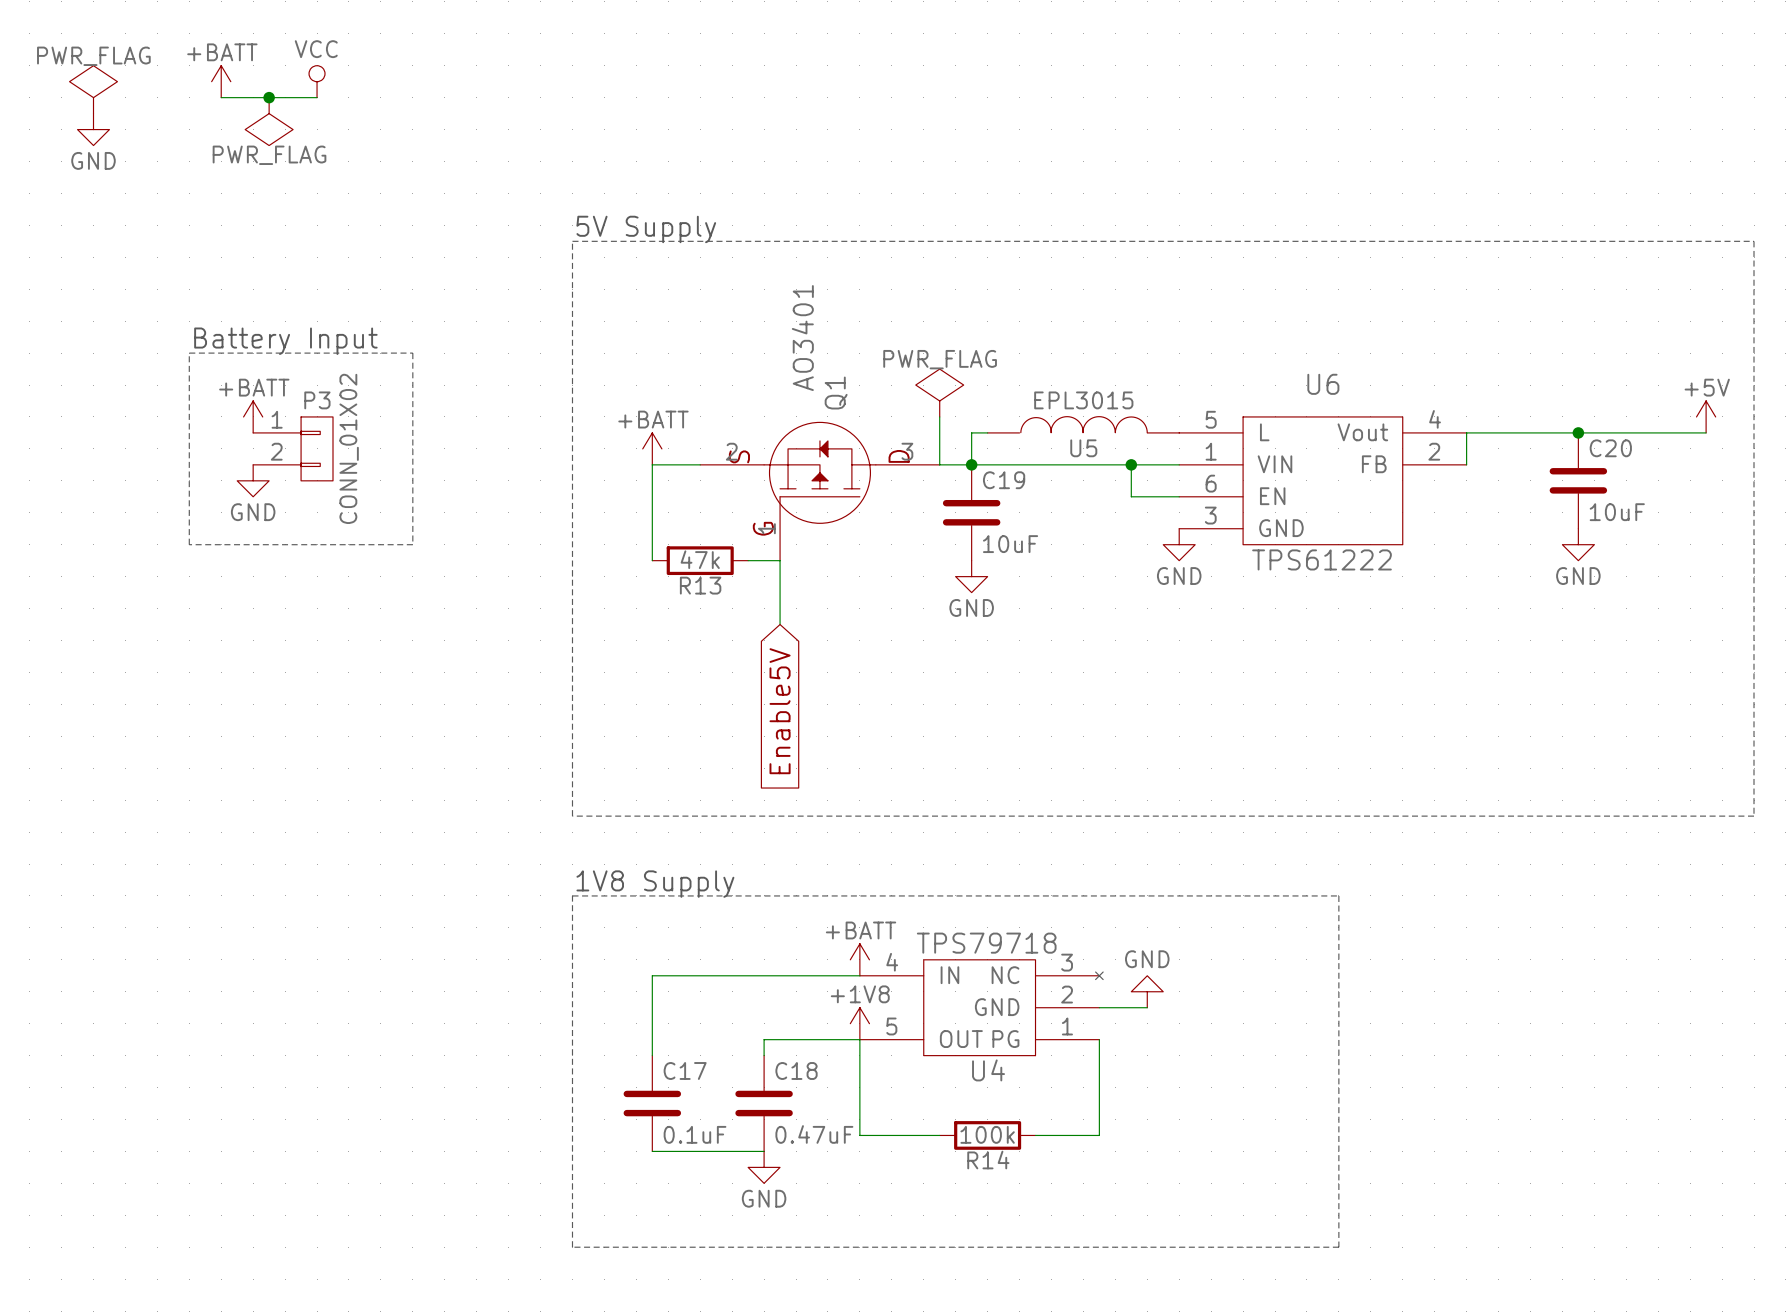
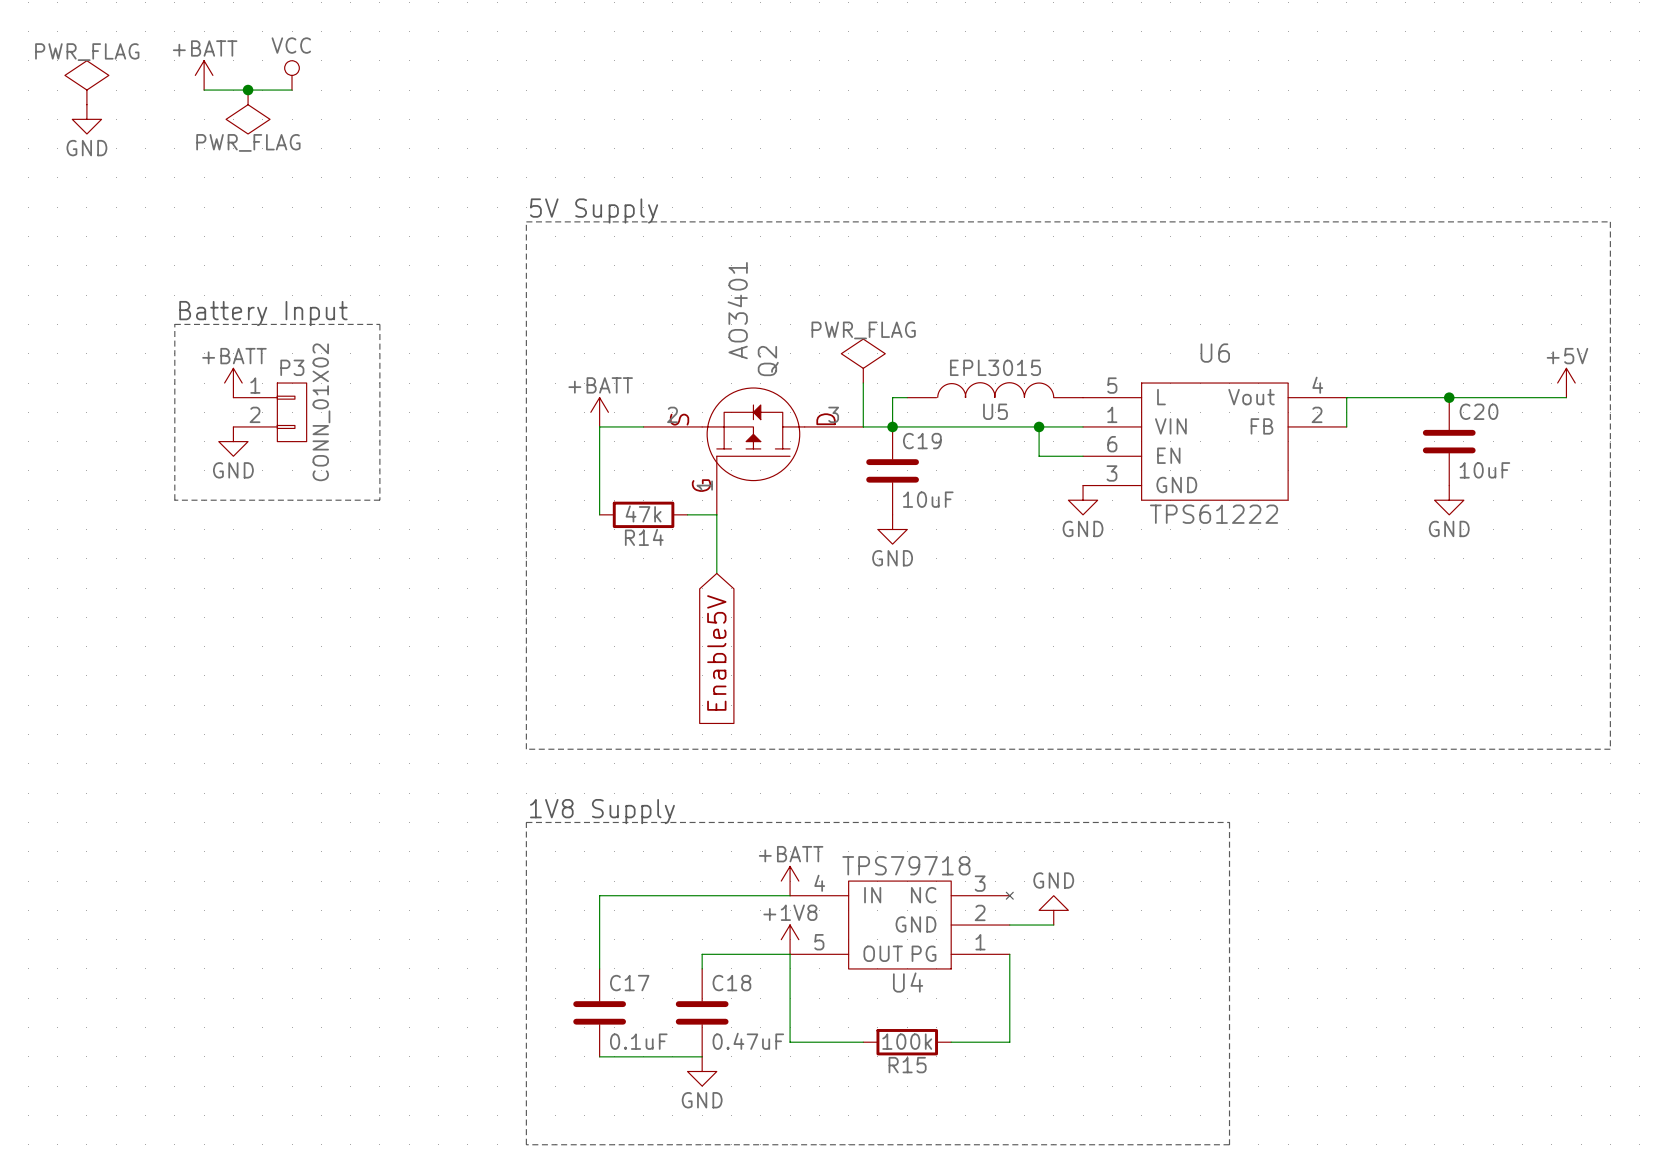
Q1 name: Q1 (836, 393) -> Q2 (768, 361)
R13 name: R13 (700, 585) -> R14 (644, 537)
R14 name: R14 (988, 1160) -> R15 (907, 1065)

